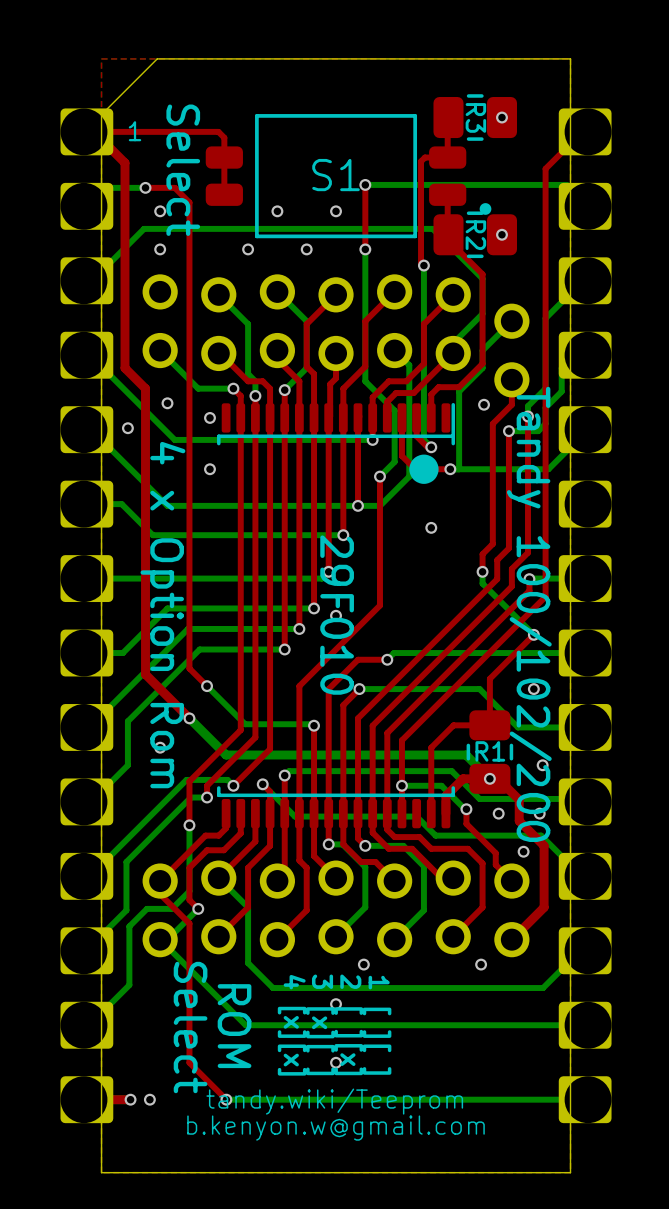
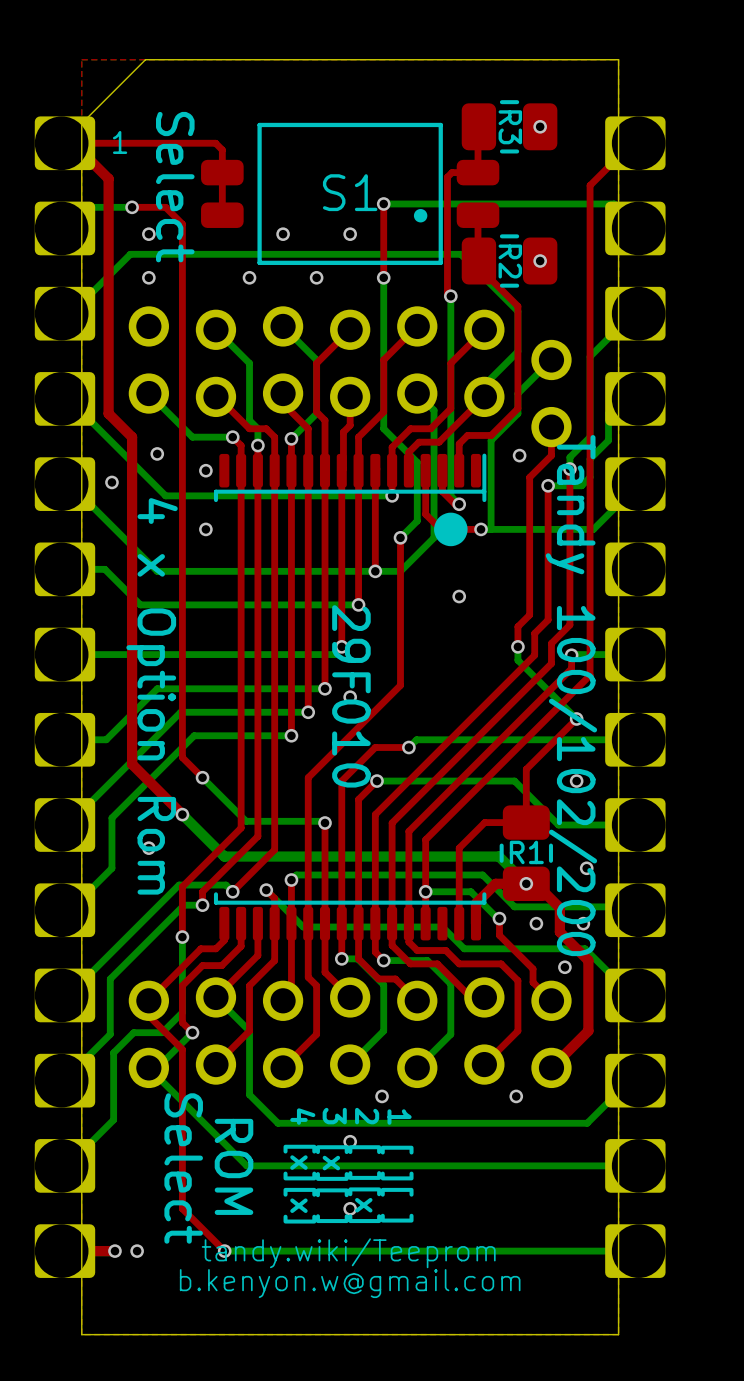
S1 footprint: [205, 114, 492, 239] -> [201, 122, 500, 265]

